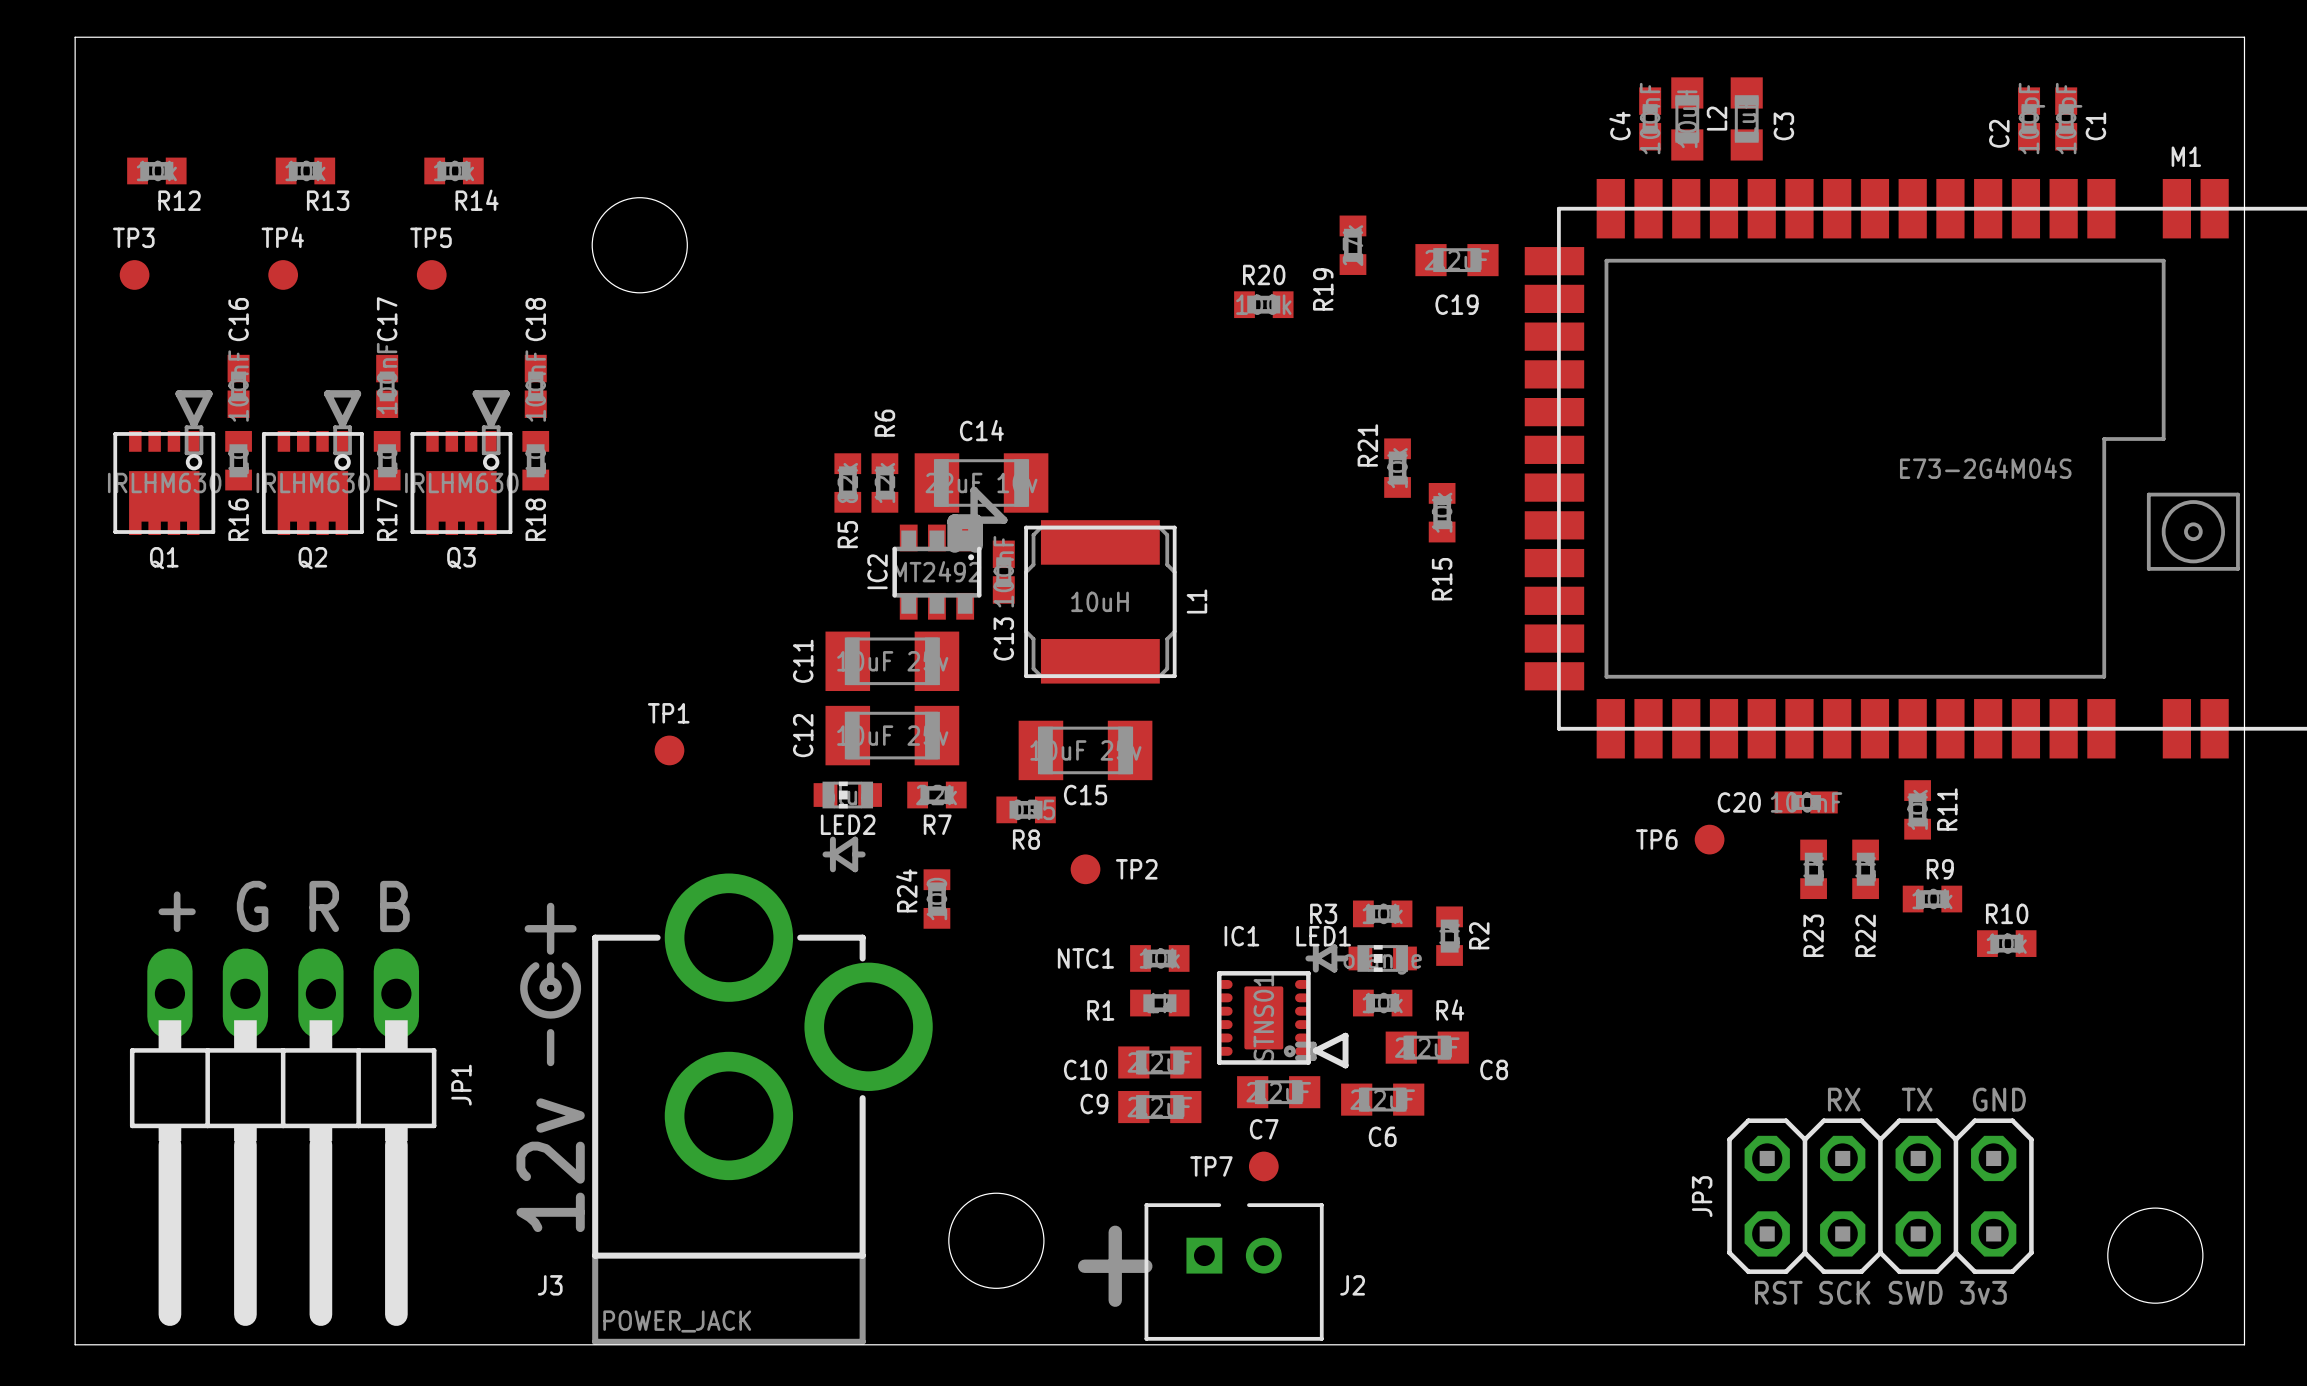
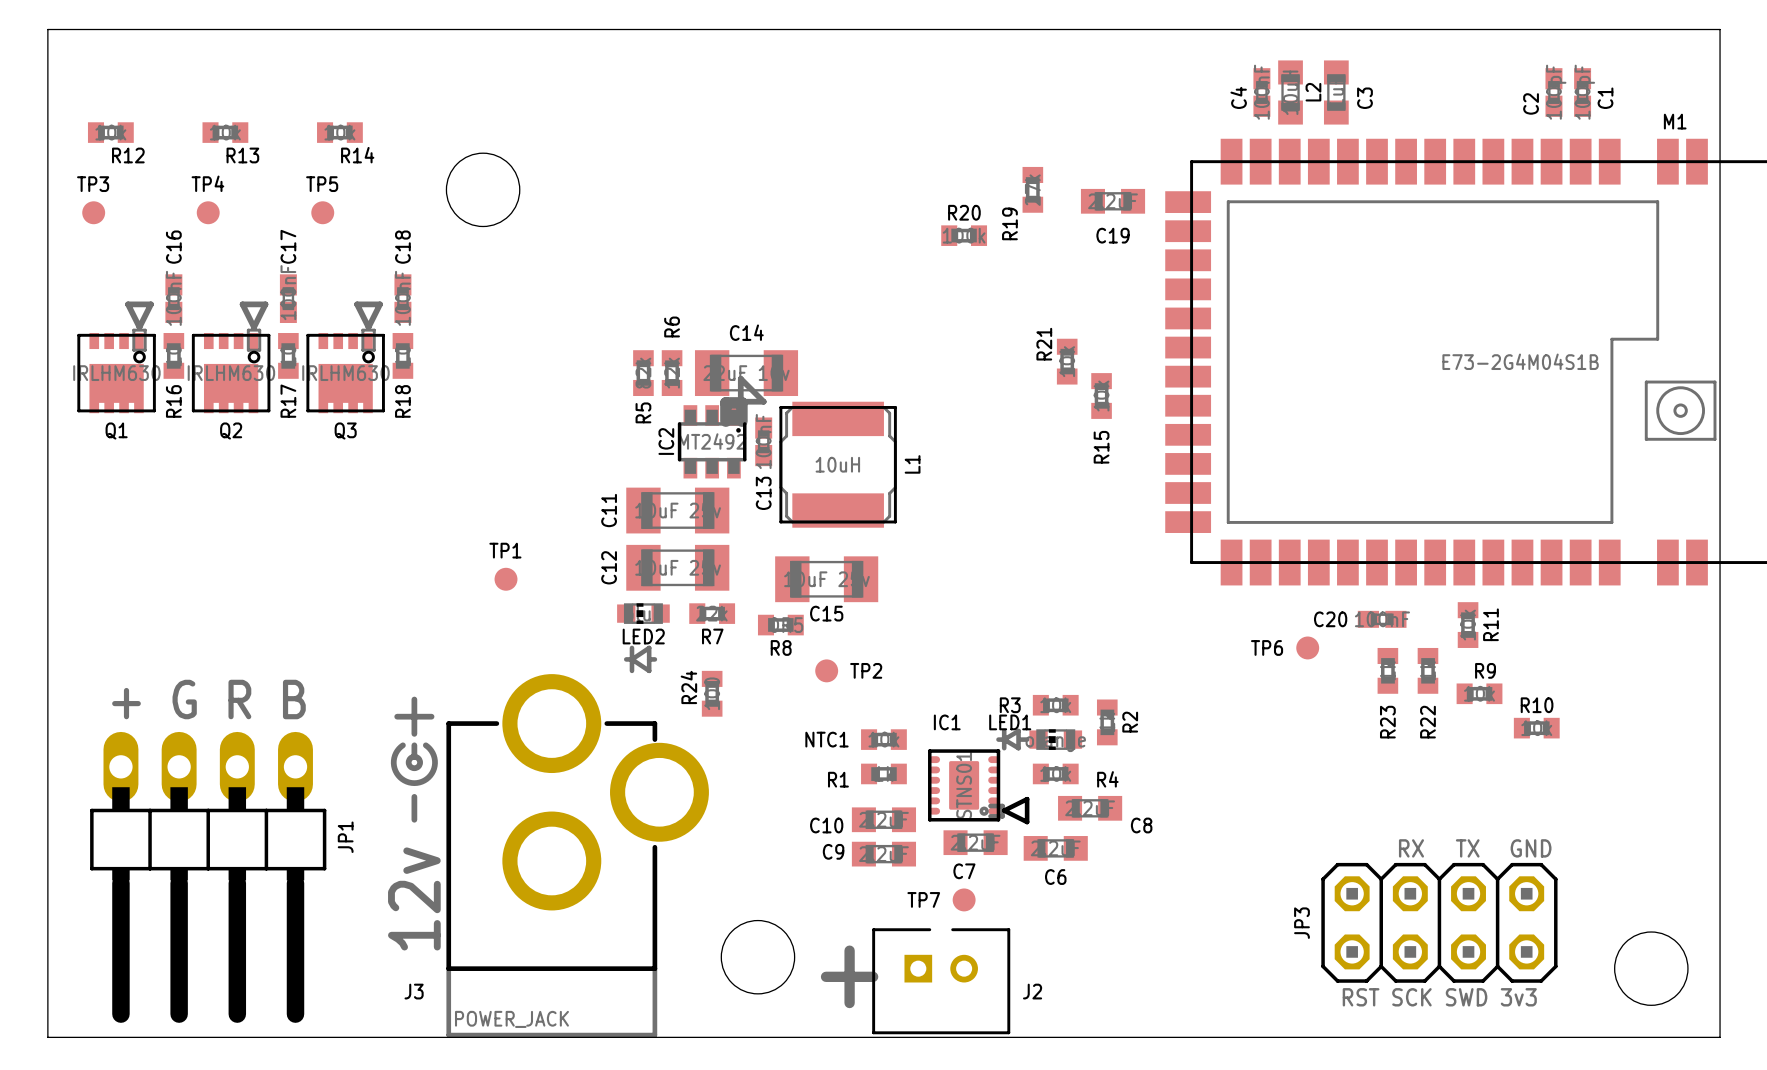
M1 value: E73-2G4M04S (1985, 468) -> E73-2G4M04S1B (1520, 361)

